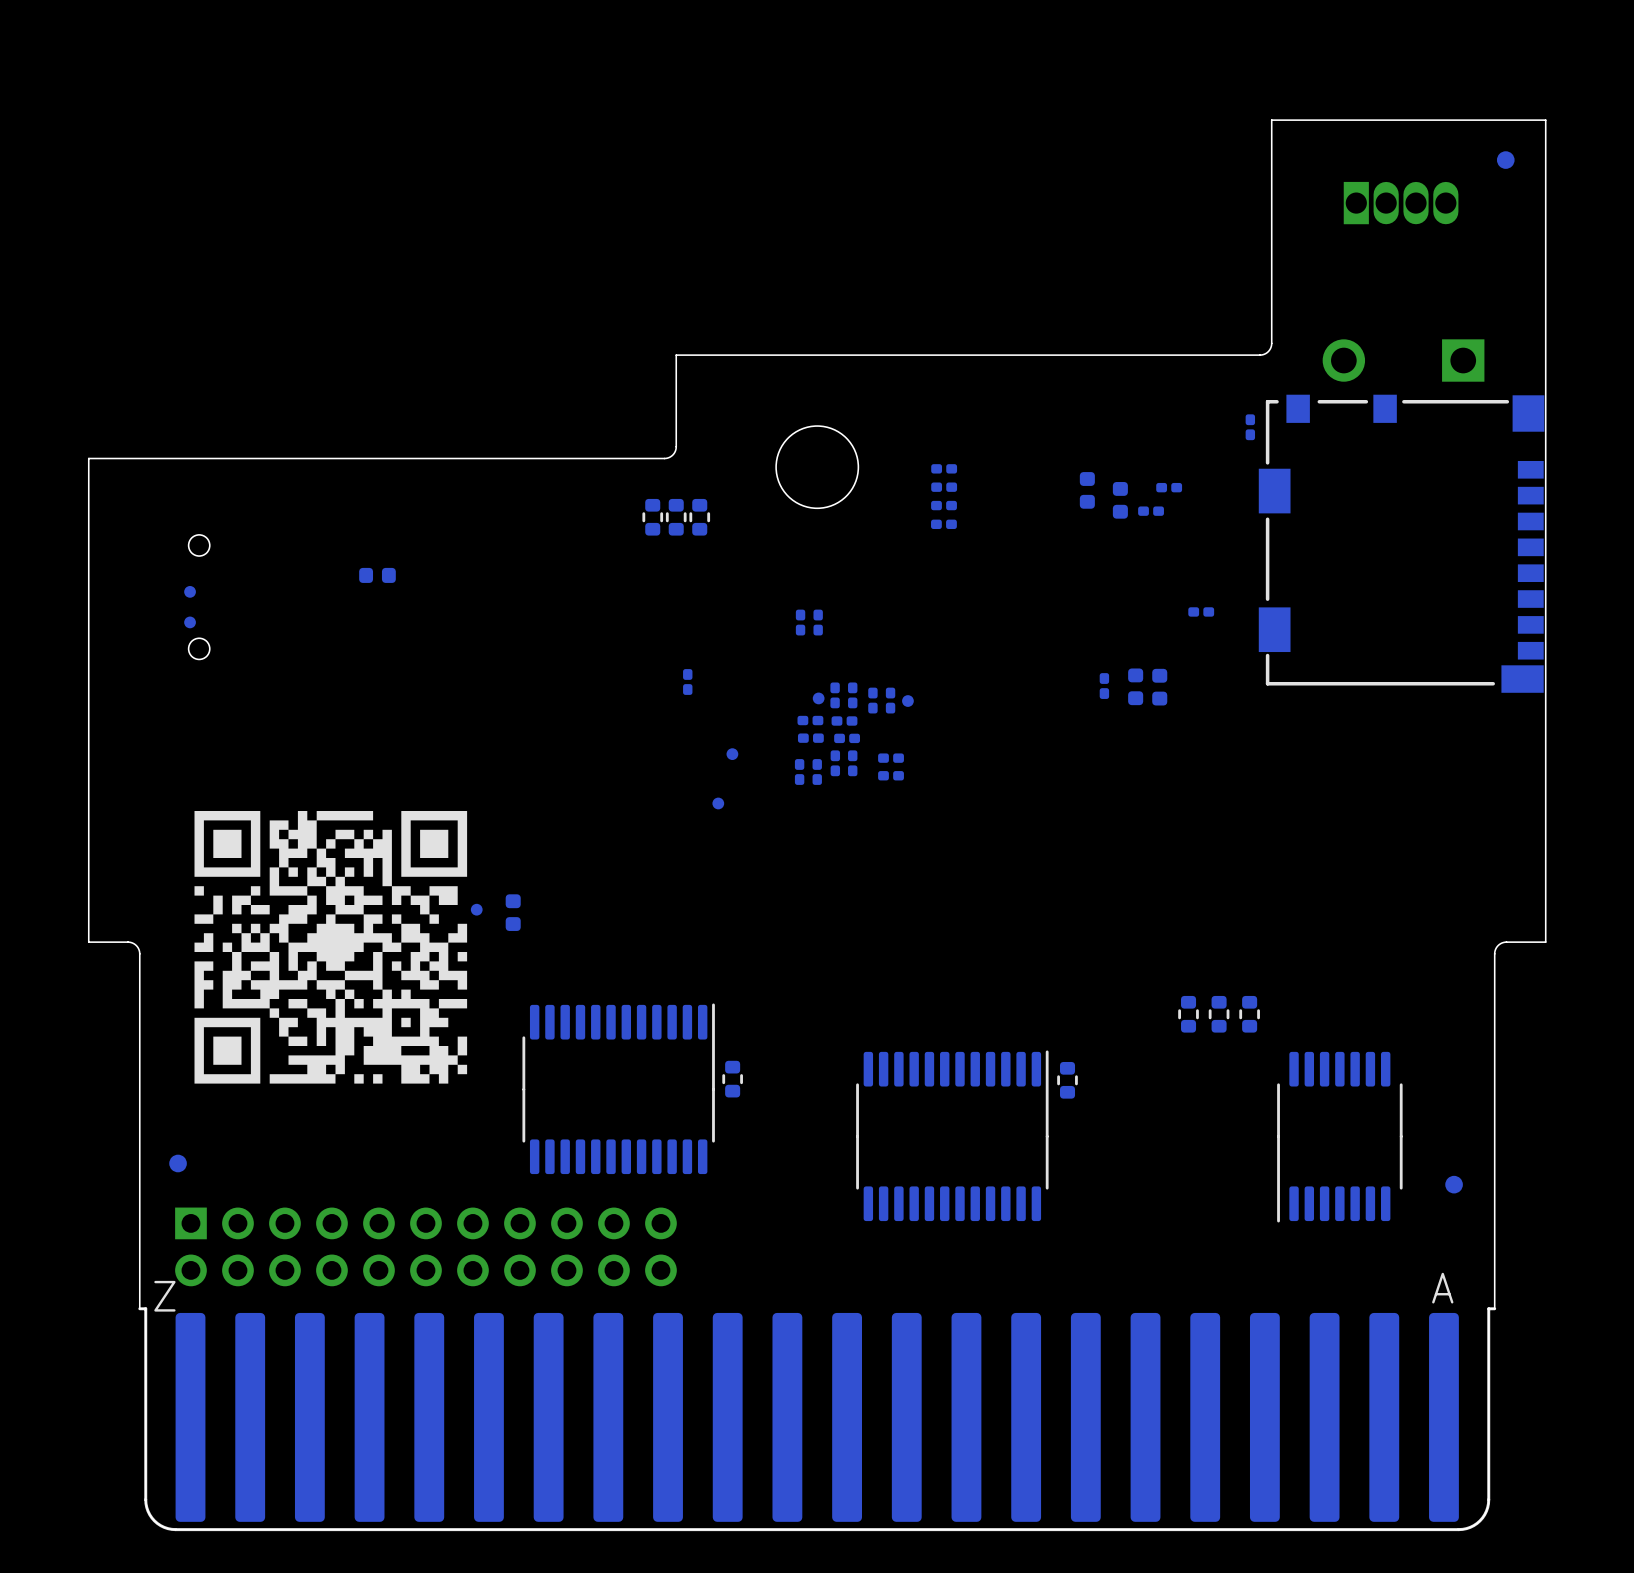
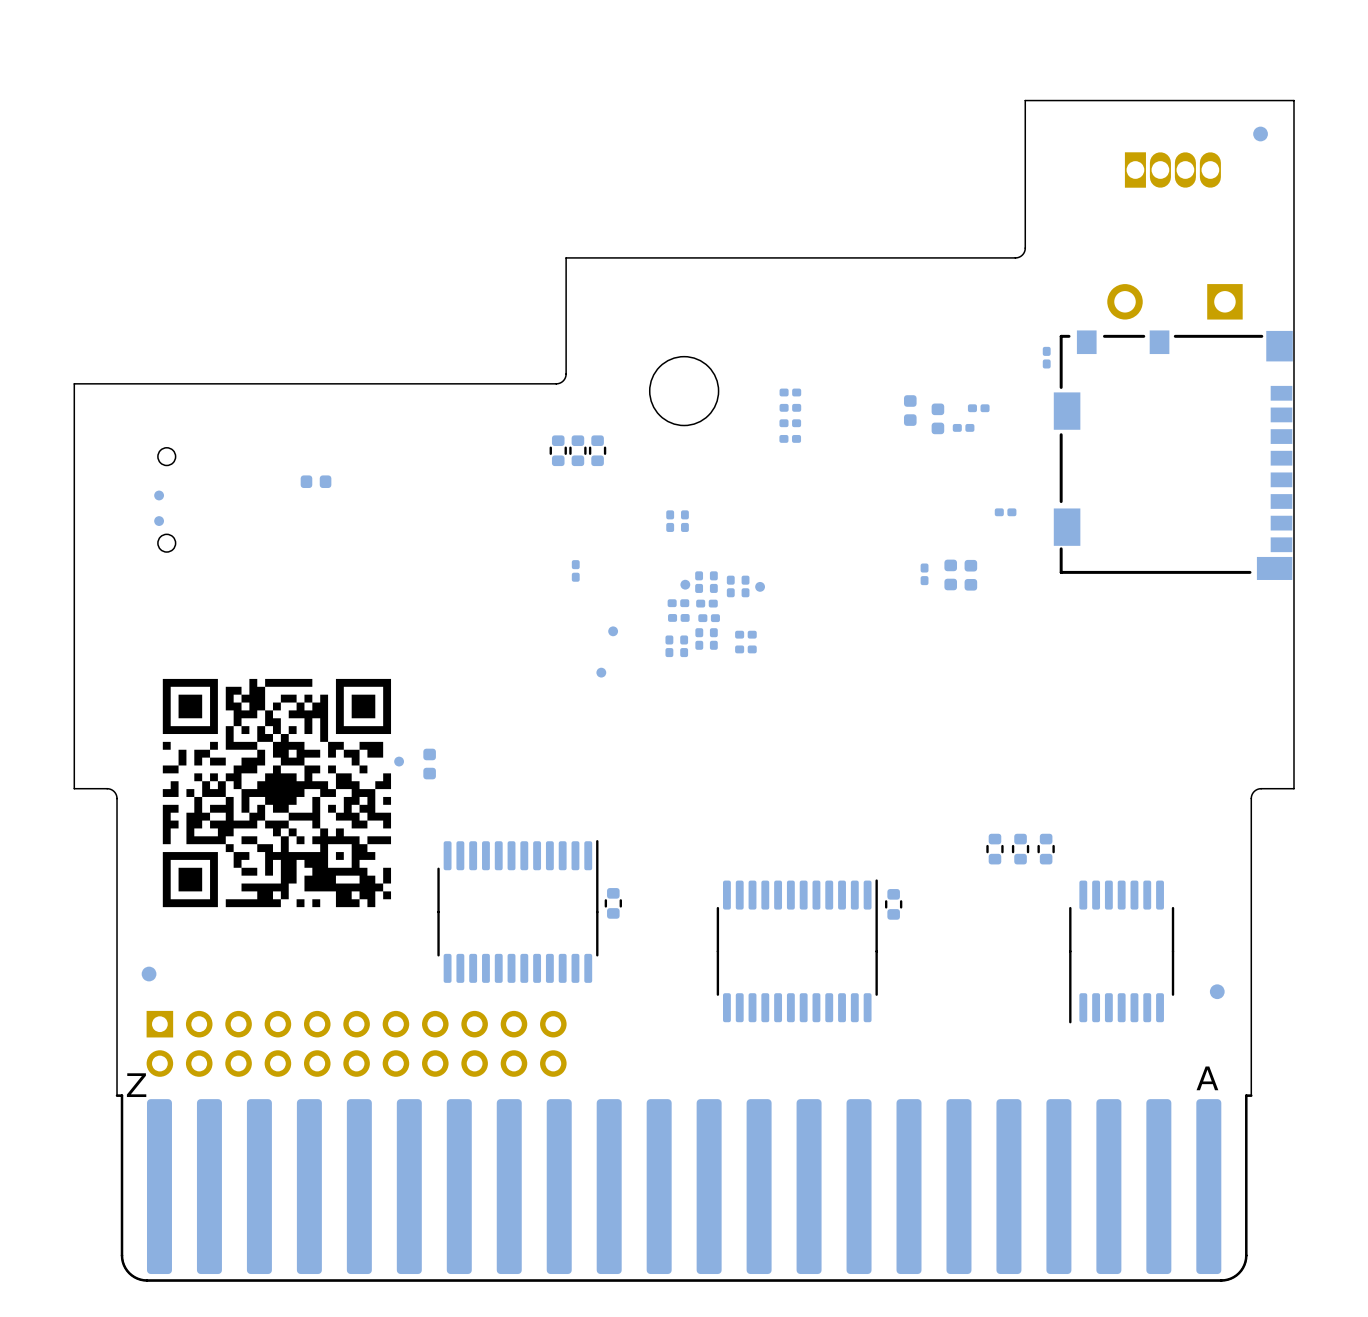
board edge: (1271, 120) (1271, 343) (1269, 350) (1264, 354) (676, 355) -> (1064, 100) (1025, 100) (1025, 248) (1023, 254) (1019, 257) (566, 257) (566, 297)
part: (652, 517) -> none
part: (676, 517) -> none
part: (699, 517) -> none
part: none -> (558, 450)
part: none -> (577, 450)
part: none -> (597, 450)

